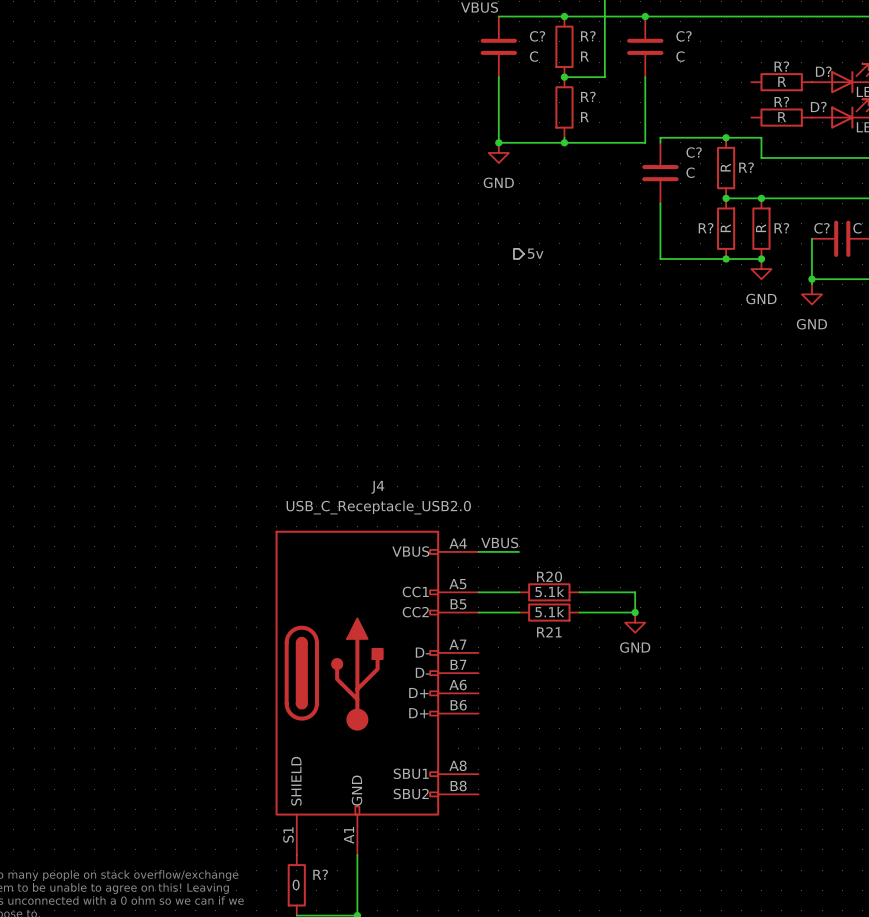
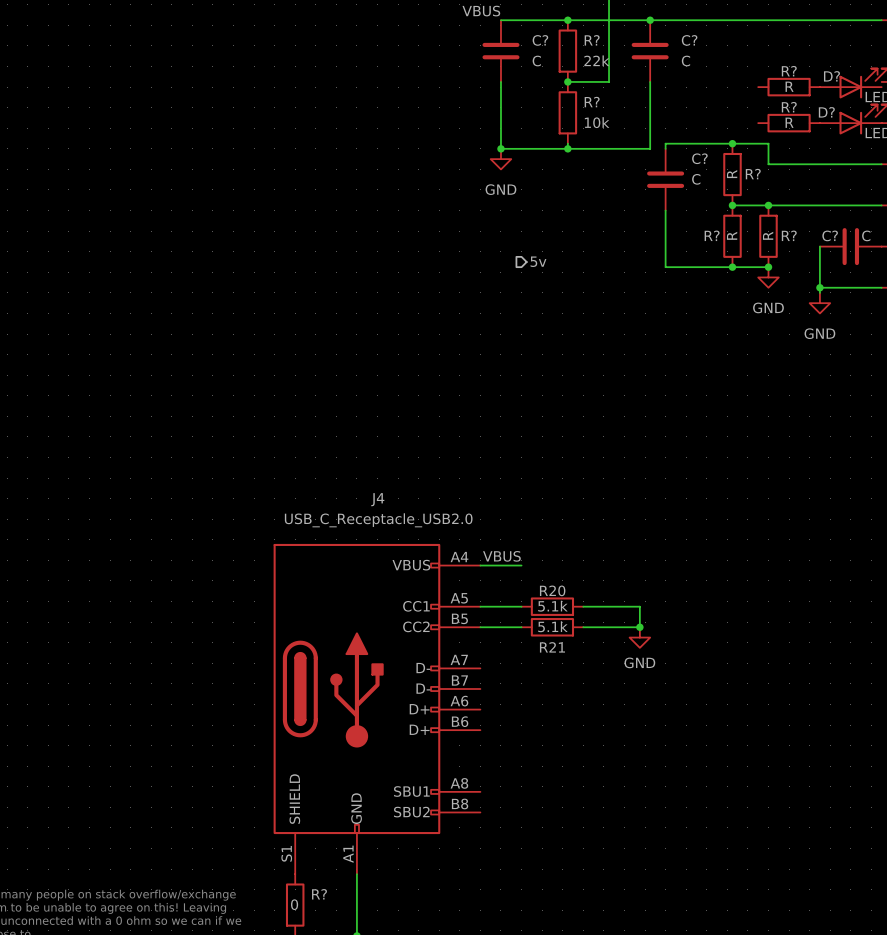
R? value: R (584, 56) -> 22k (596, 60)
R? value: R (584, 117) -> 10k (597, 122)

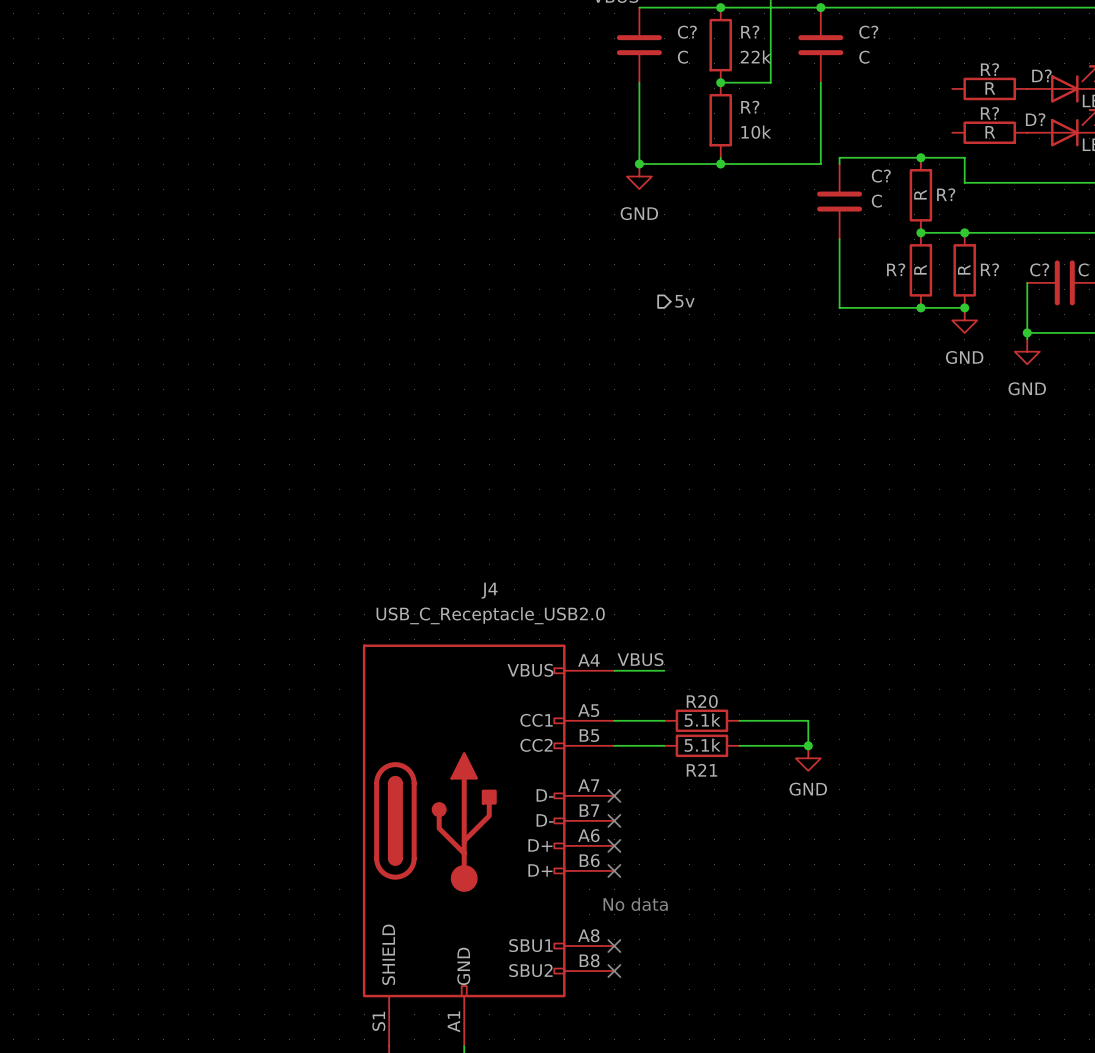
no-connect mark: none -> (614, 795)
no-connect mark: none -> (614, 820)
no-connect mark: none -> (614, 845)
no-connect mark: none -> (614, 870)
text: none -> No data (635, 904)
no-connect mark: none -> (614, 946)
no-connect mark: none -> (614, 971)

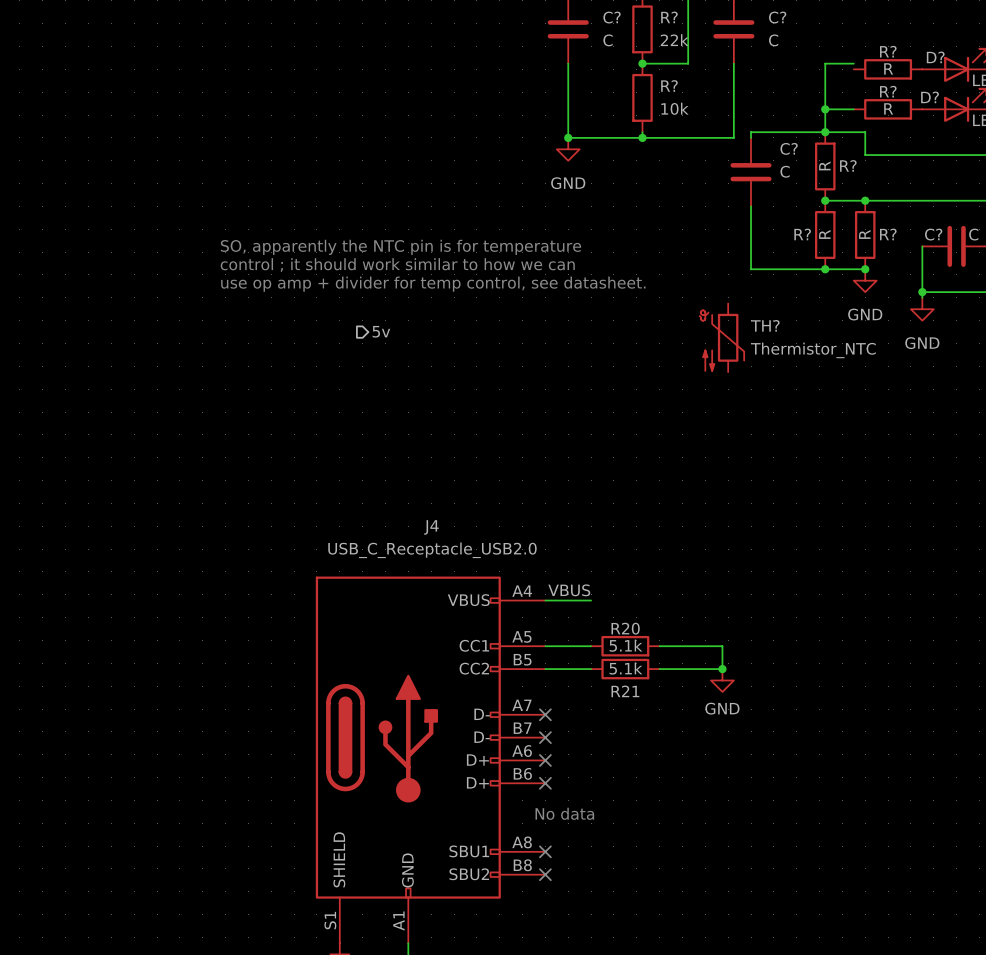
wire: none -> (853, 63) (825, 63) (825, 132)
wire: none -> (825, 109) (853, 109)
junction: none -> (825, 109)
text: none -> SO, apparently the NTC pin is for temperature (400, 247)
hierarchical label: 5v (684, 301) -> none
text: none -> control ; it should work similar to how we can (397, 265)
text: none -> use op amp + divider for temp control, see datasheet. (433, 284)
hierarchical label: none -> 5v (381, 331)
TH?: none -> Thermistor_NTC (721, 337)

